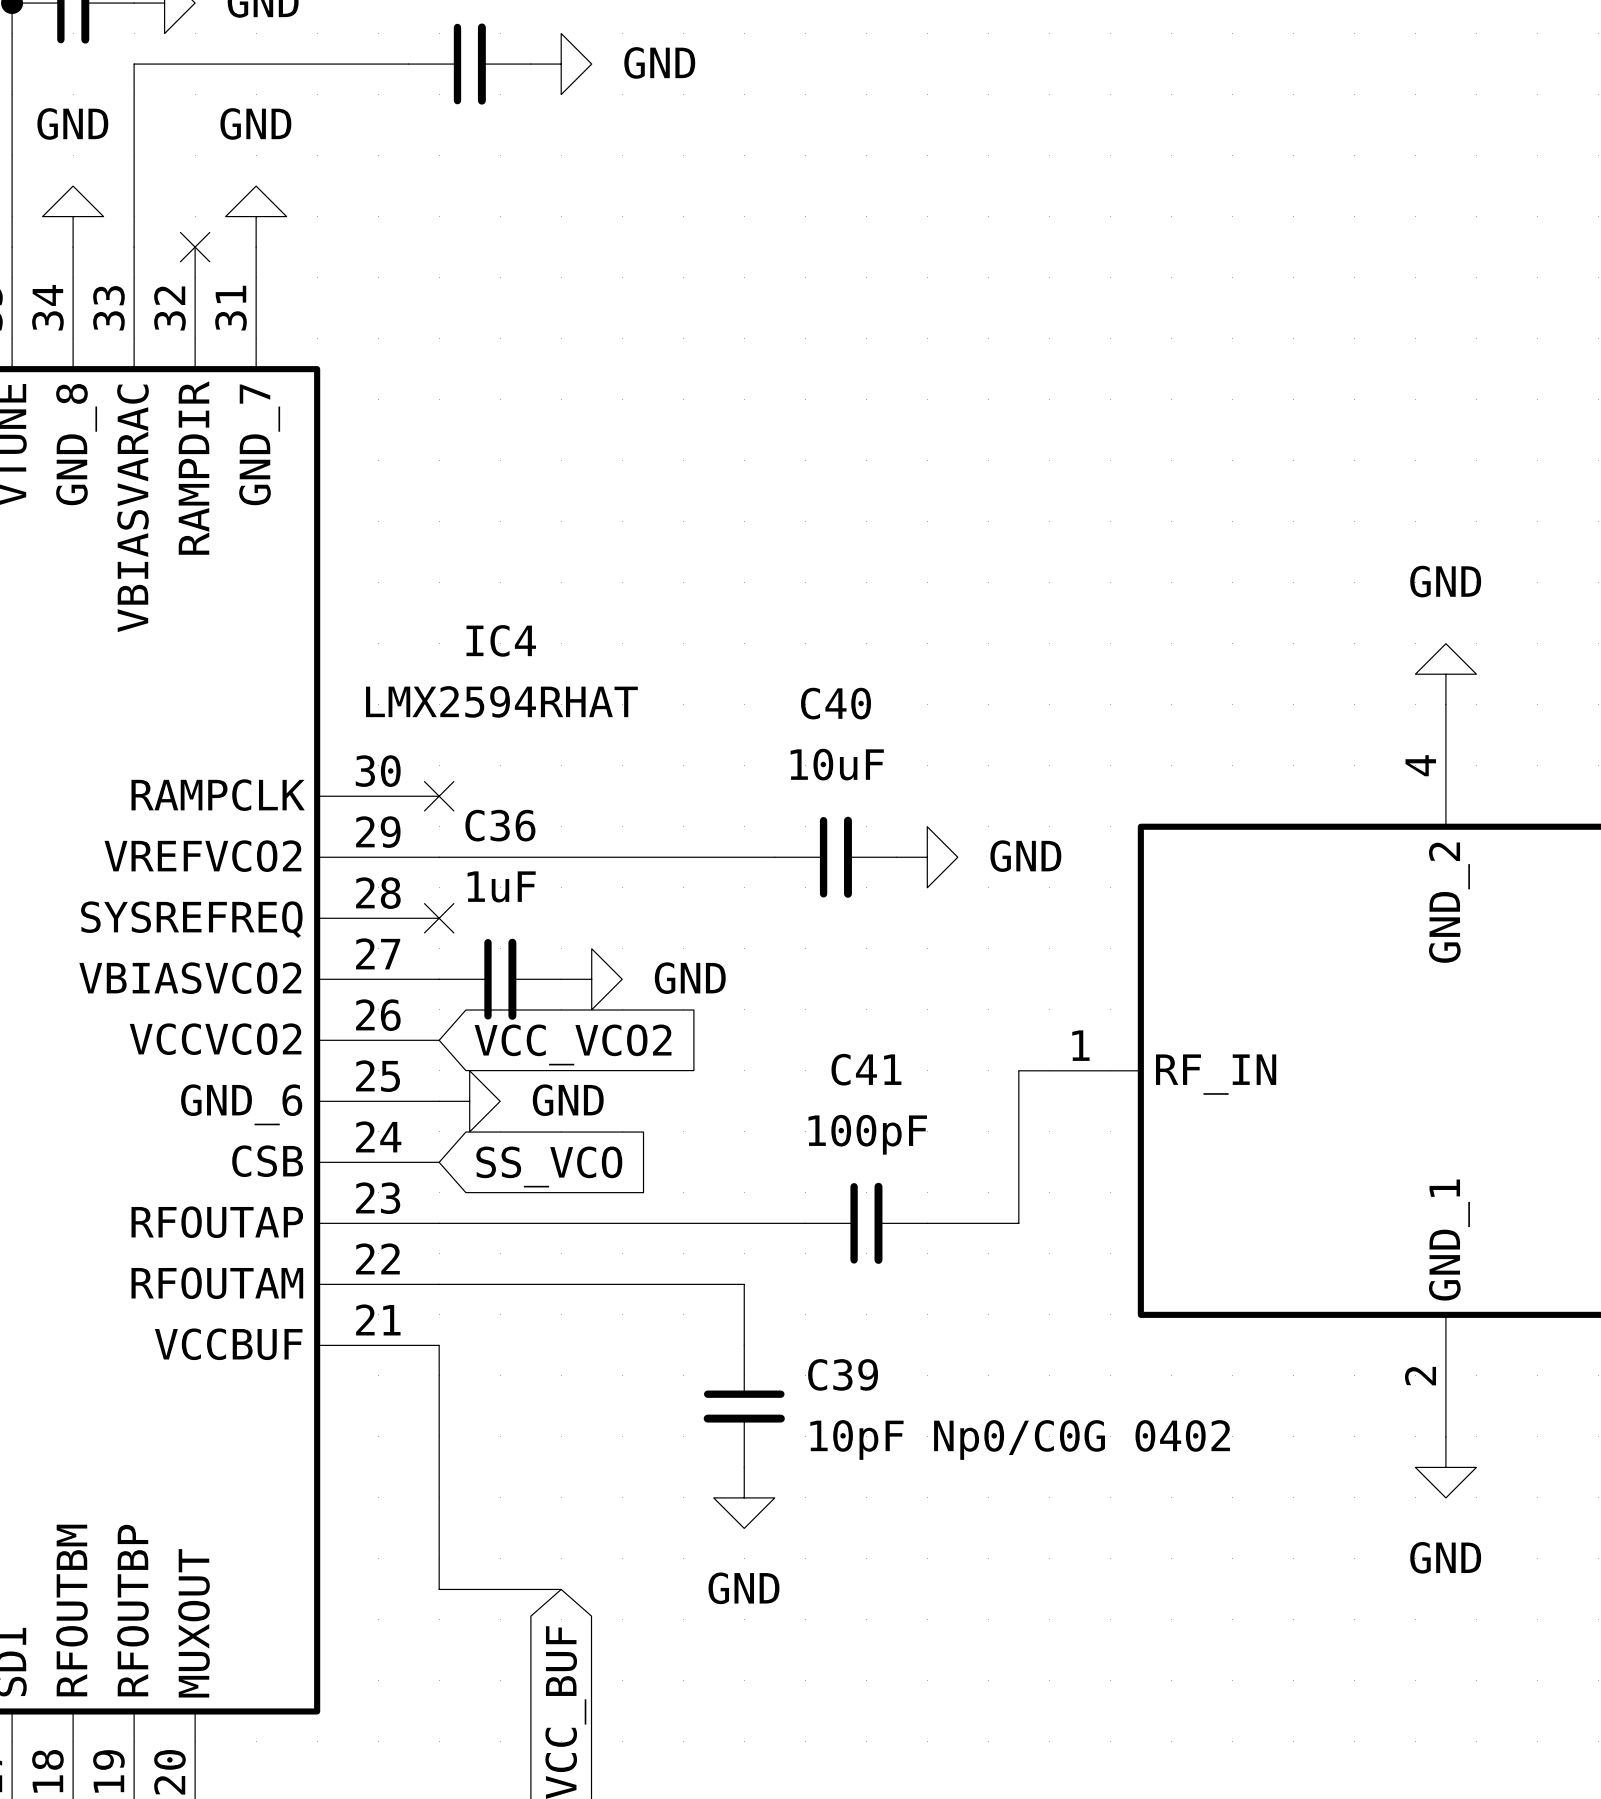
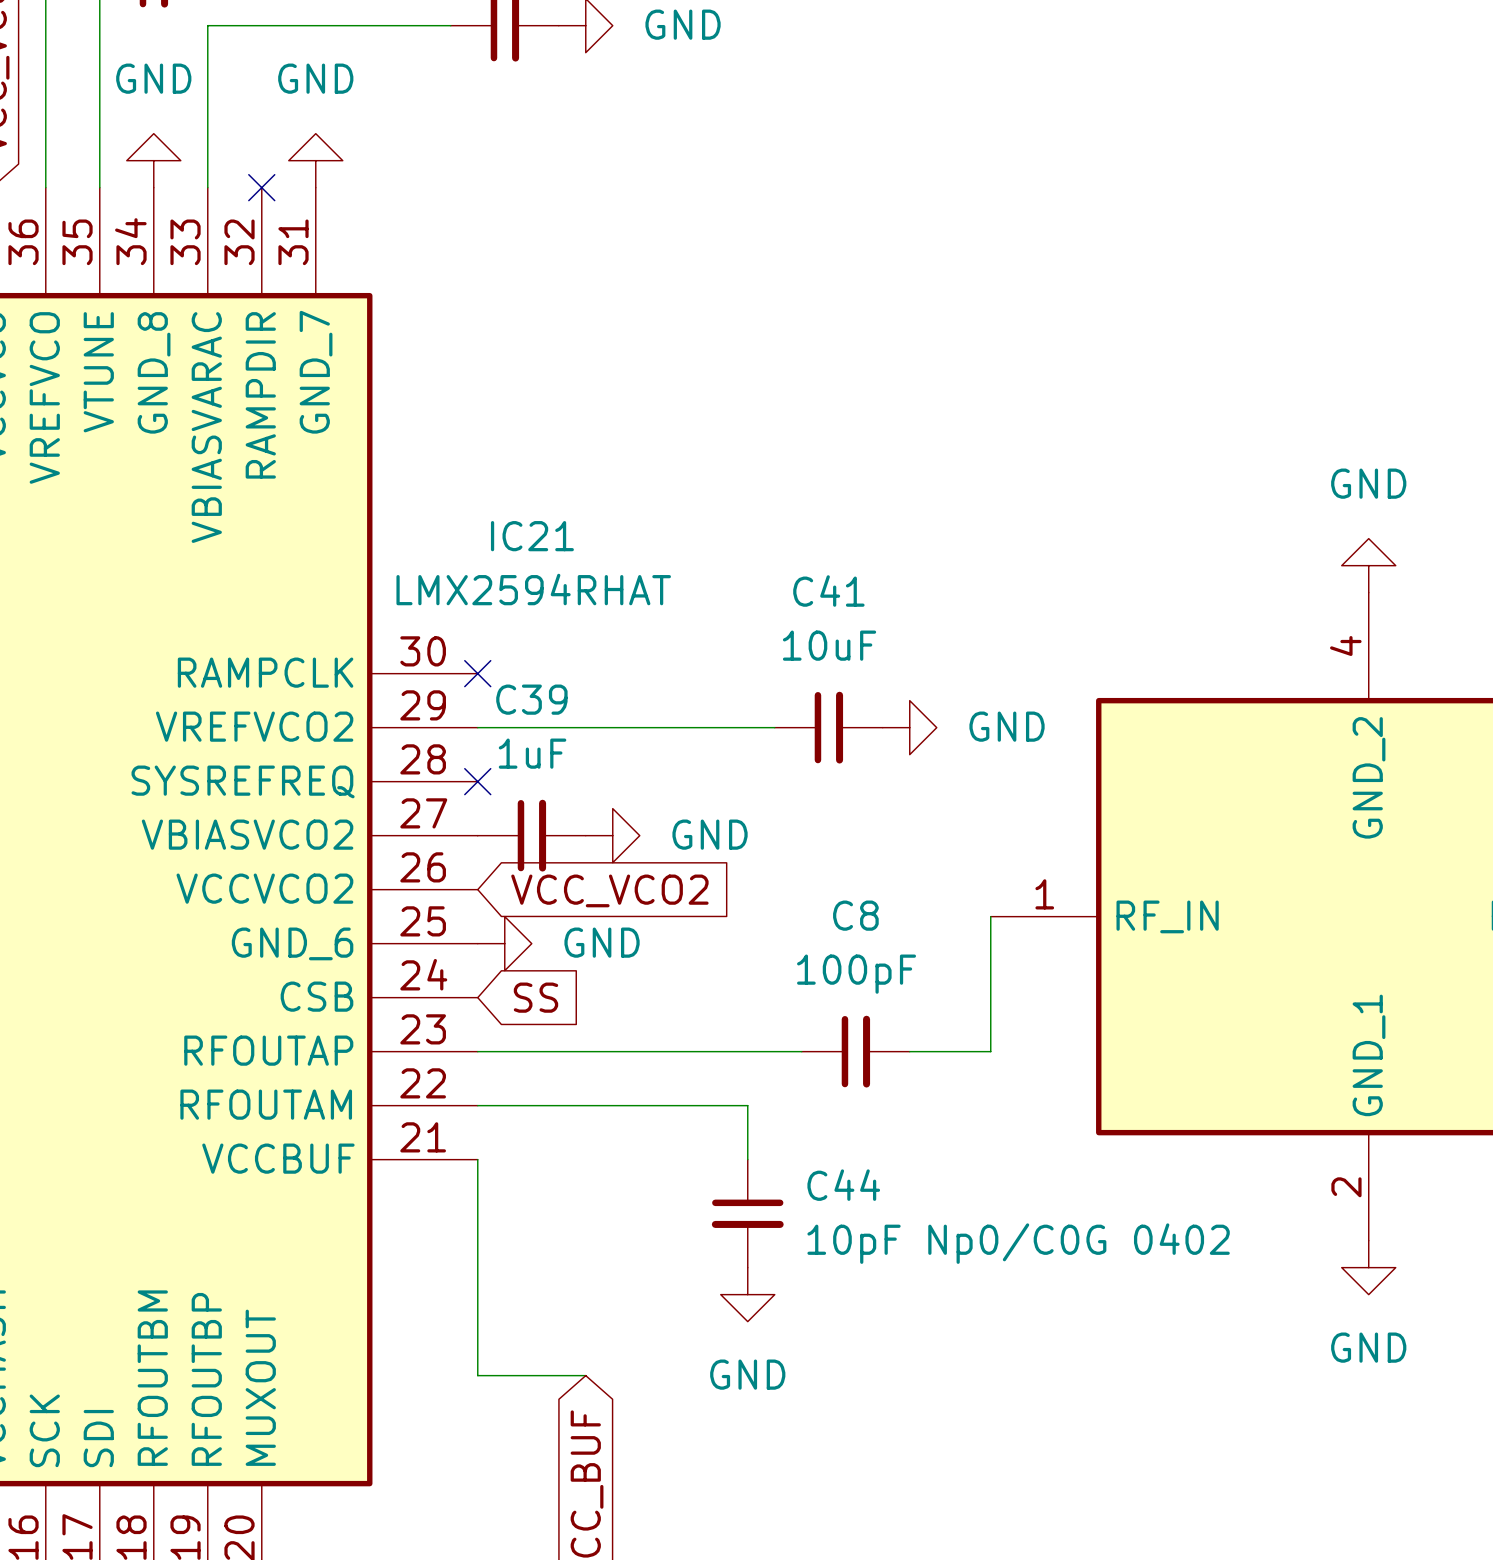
IC4 name: IC4 (501, 640) -> IC21 (532, 536)
C40 name: C40 (835, 703) -> C41 (828, 591)
C36 name: C36 (500, 825) -> C39 (531, 699)
C41 name: C41 (866, 1069) -> C8 (855, 915)
global label: SS_VCO (549, 1166) -> SS (535, 997)
C39 name: C39 (843, 1374) -> C44 (843, 1185)

